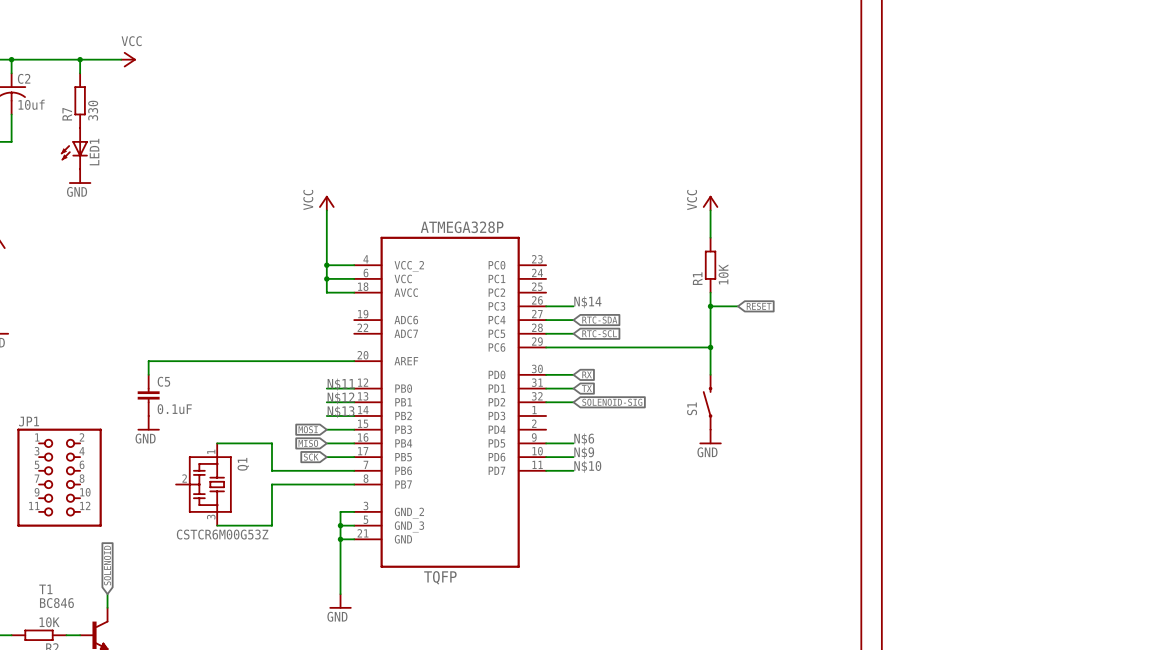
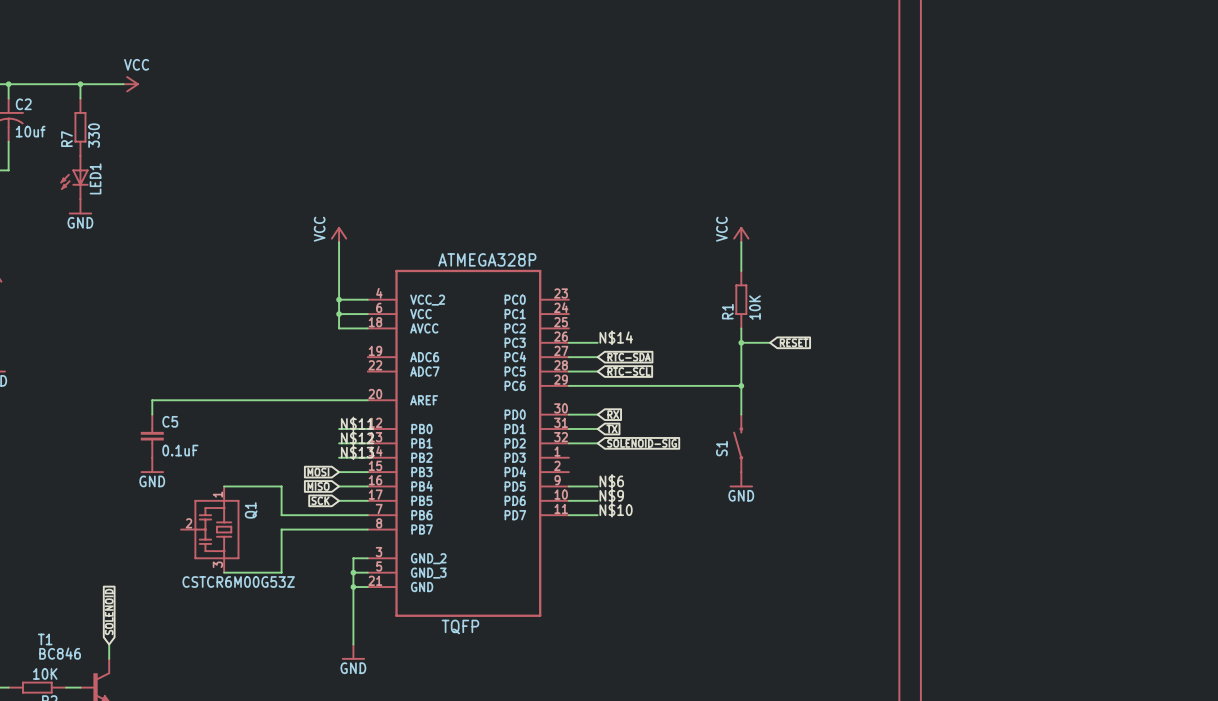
JP1: (59, 477) -> none

